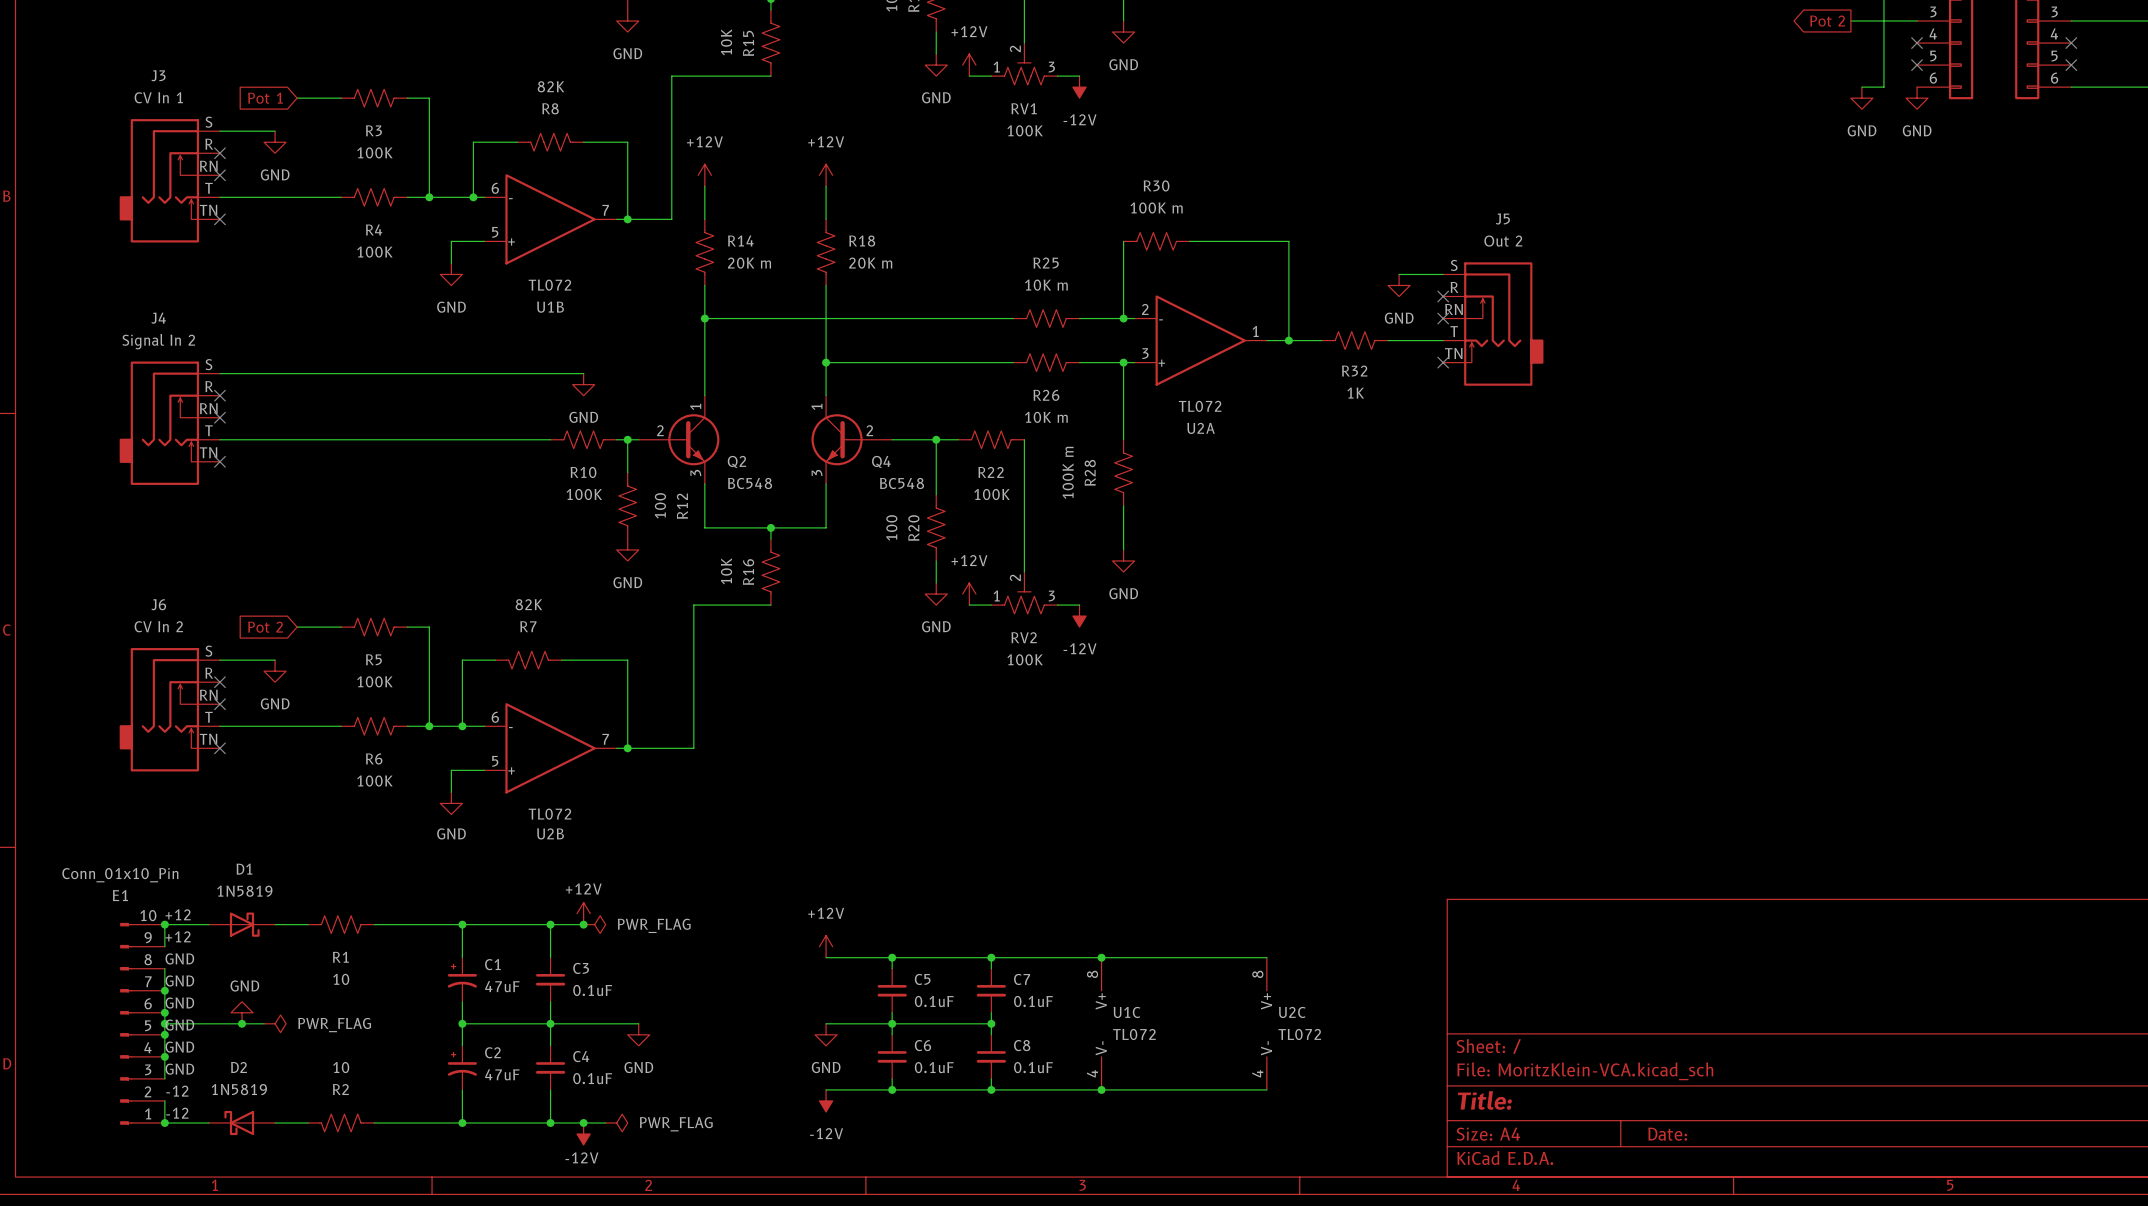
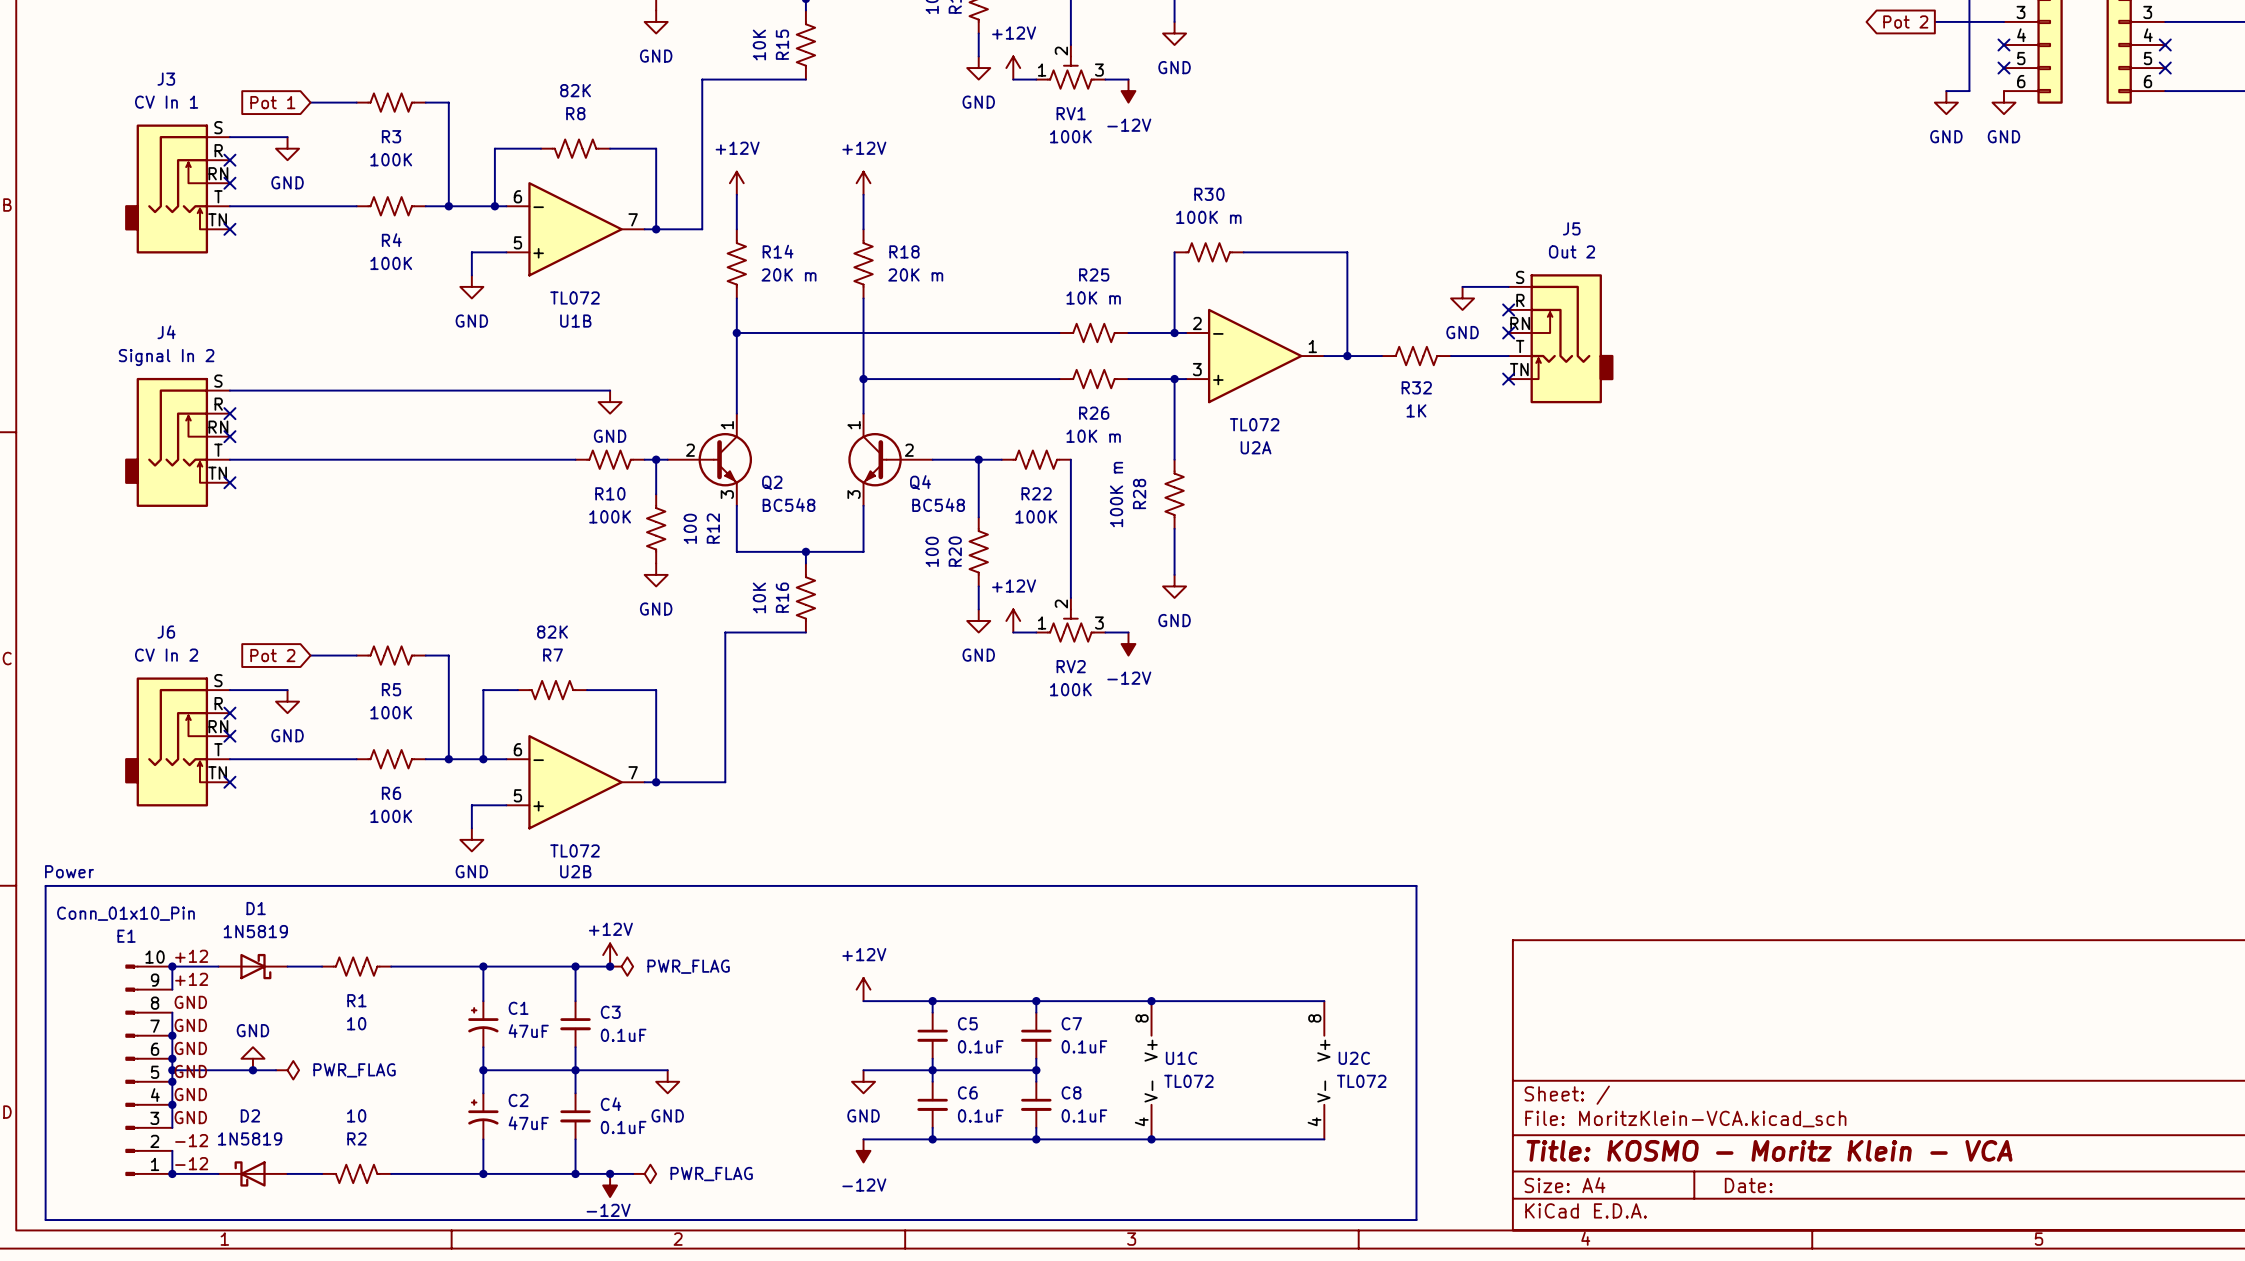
text: none -> Power (69, 871)
line: none -> (45, 885) (1416, 885) (1416, 1220) (45, 1220) (45, 885)
title block: Title: (1484, 1100) -> Title: KOSMO - Moritz Klein - VCA (1769, 1150)

